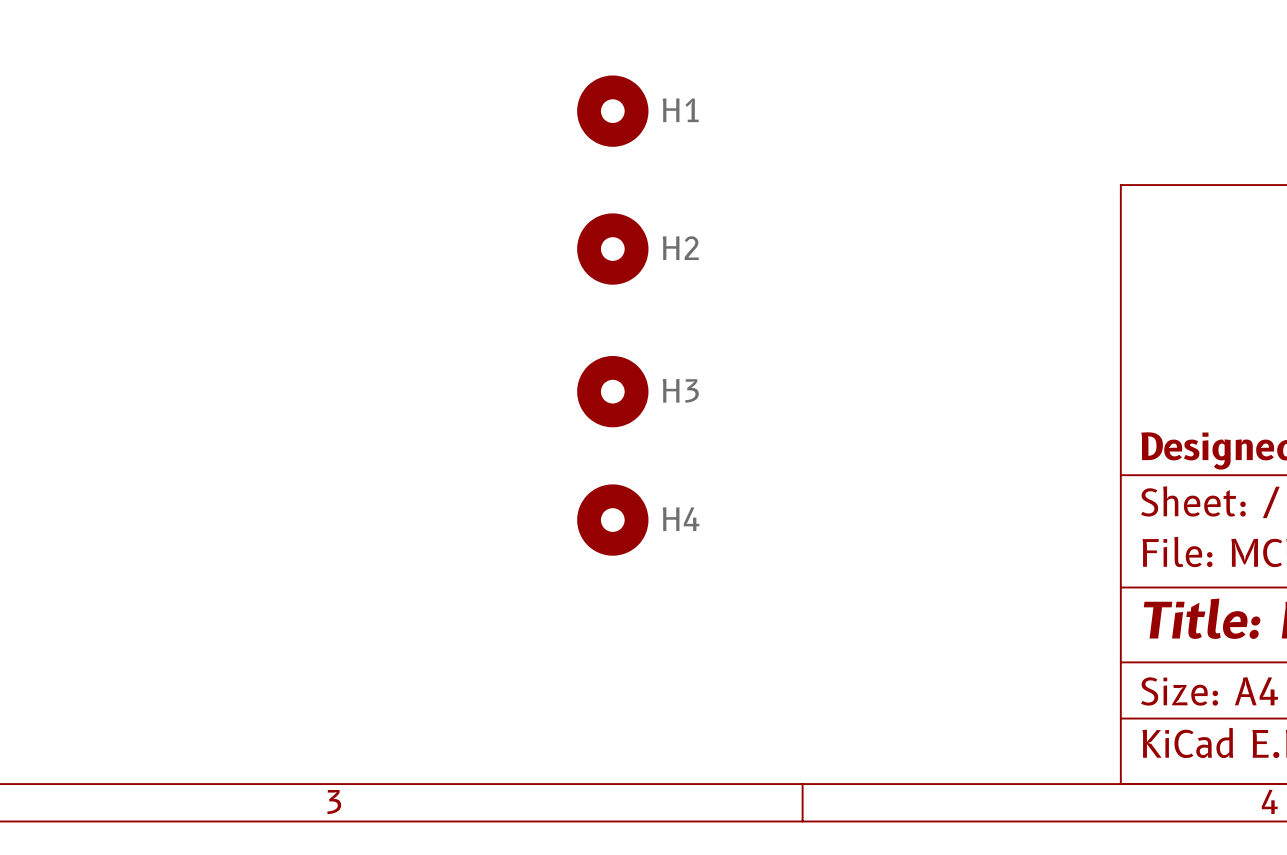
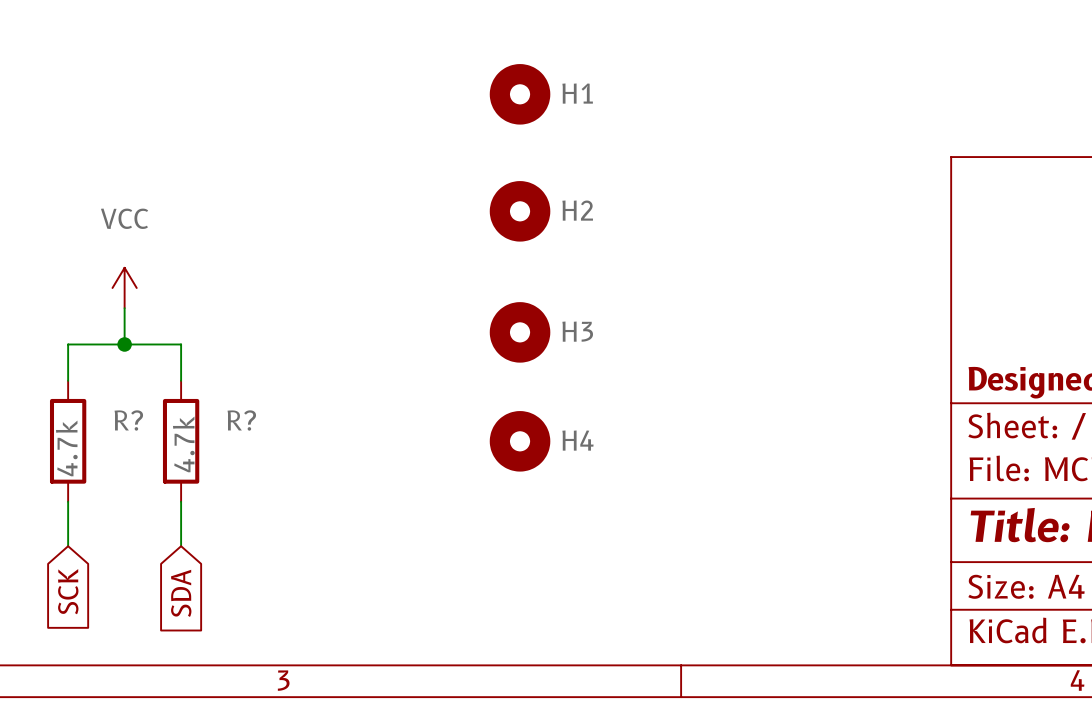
power symbol: none -> VCC (124, 287)
wire: none -> (124, 308) (124, 344)
junction: none -> (124, 344)
wire: none -> (68, 380) (68, 344) (181, 344) (181, 380)
R?: none -> 4.7k (68, 441)
R?: none -> 4.7k (181, 441)
wire: none -> (68, 501) (68, 546)
wire: none -> (181, 501) (181, 546)
global label: none -> SCK (68, 591)
global label: none -> SDA (181, 593)

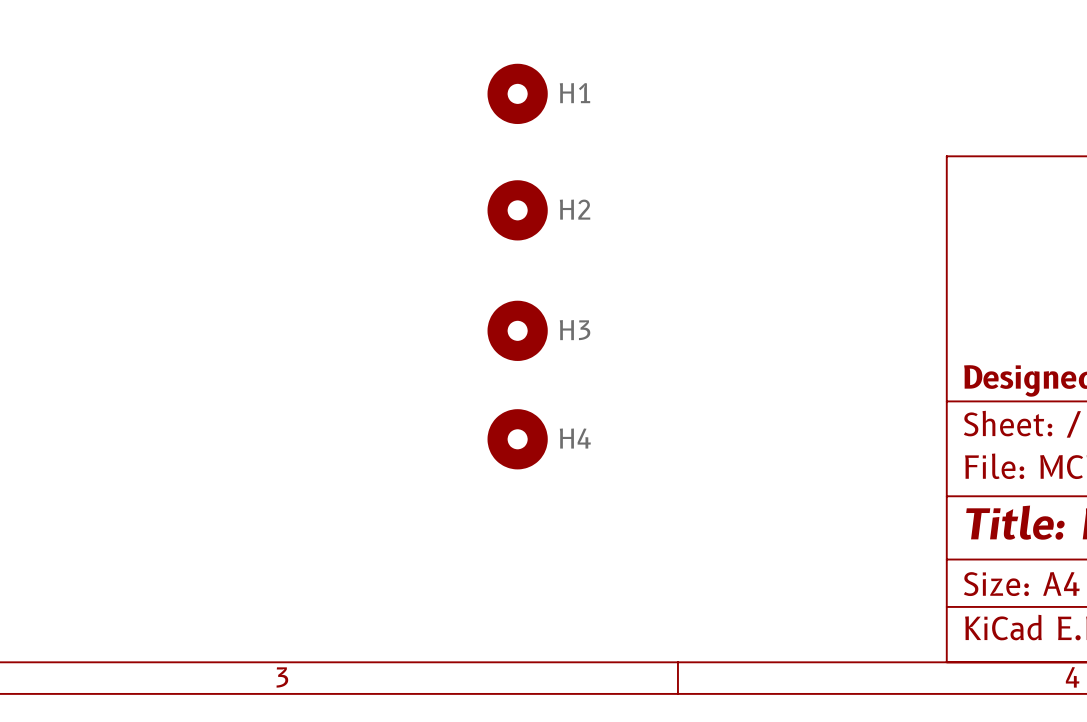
power symbol: VCC (124, 287) -> none
wire: (124, 308) (124, 344) -> none
junction: (124, 344) -> none
wire: (68, 380) (68, 344) (181, 344) (181, 380) -> none
R?: 4.7k (68, 441) -> none
R?: 4.7k (181, 441) -> none
wire: (68, 501) (68, 546) -> none
wire: (181, 501) (181, 546) -> none
global label: SCK (68, 591) -> none
global label: SDA (181, 593) -> none

